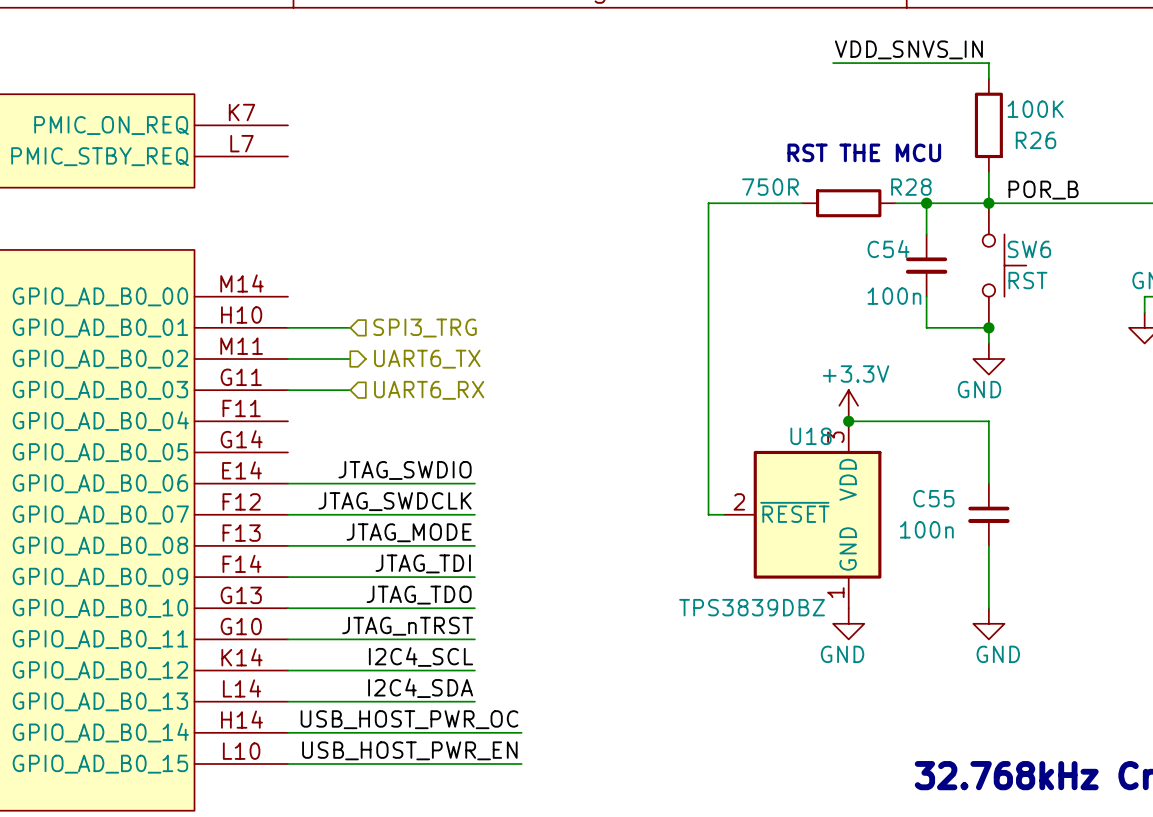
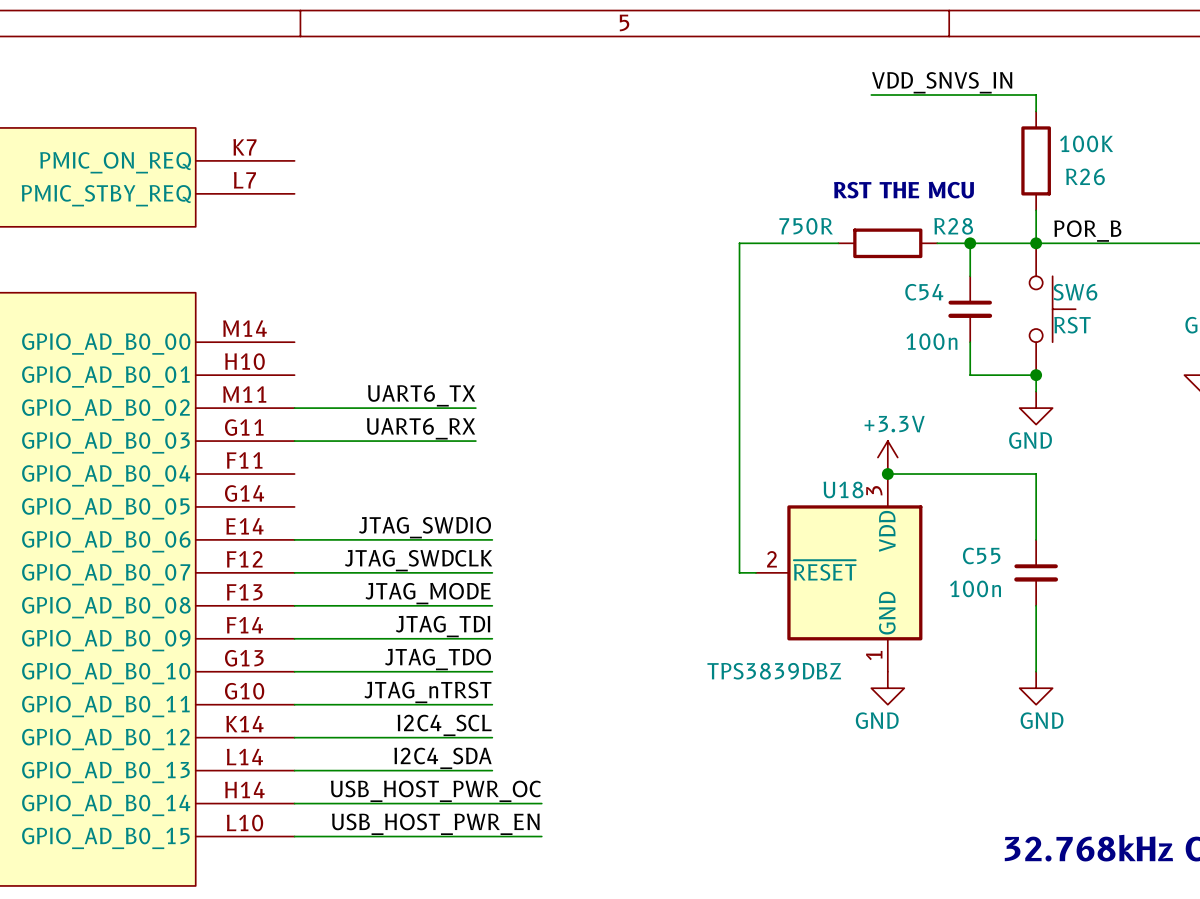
wire: (287, 327) (350, 327) -> none
hierarchical label: SPI3_TRG (425, 328) -> none
label: none -> UART6_TX (421, 395)
wire: none -> (360, 408) (475, 408)
hierarchical label: UART6_TX (427, 359) -> none
label: none -> UART6_RX (421, 428)
wire: none -> (360, 441) (475, 441)
hierarchical label: UART6_RX (429, 390) -> none

